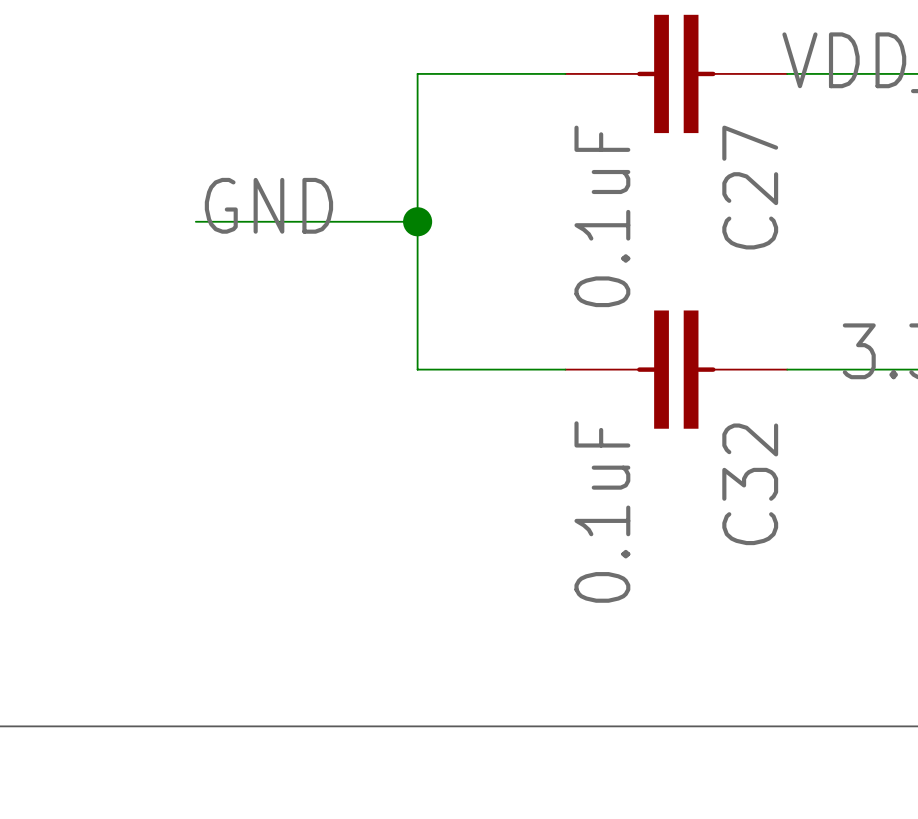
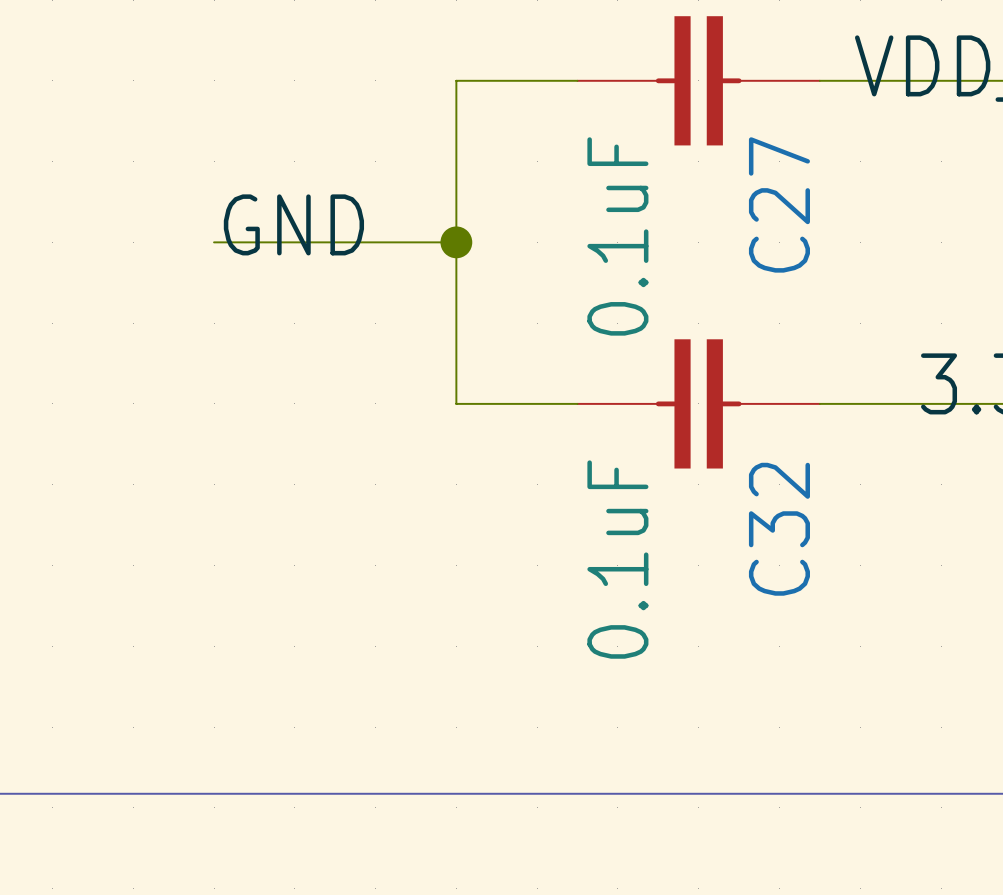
C27 position: (676, 73) -> (698, 80)
C32 position: (676, 369) -> (698, 403)

